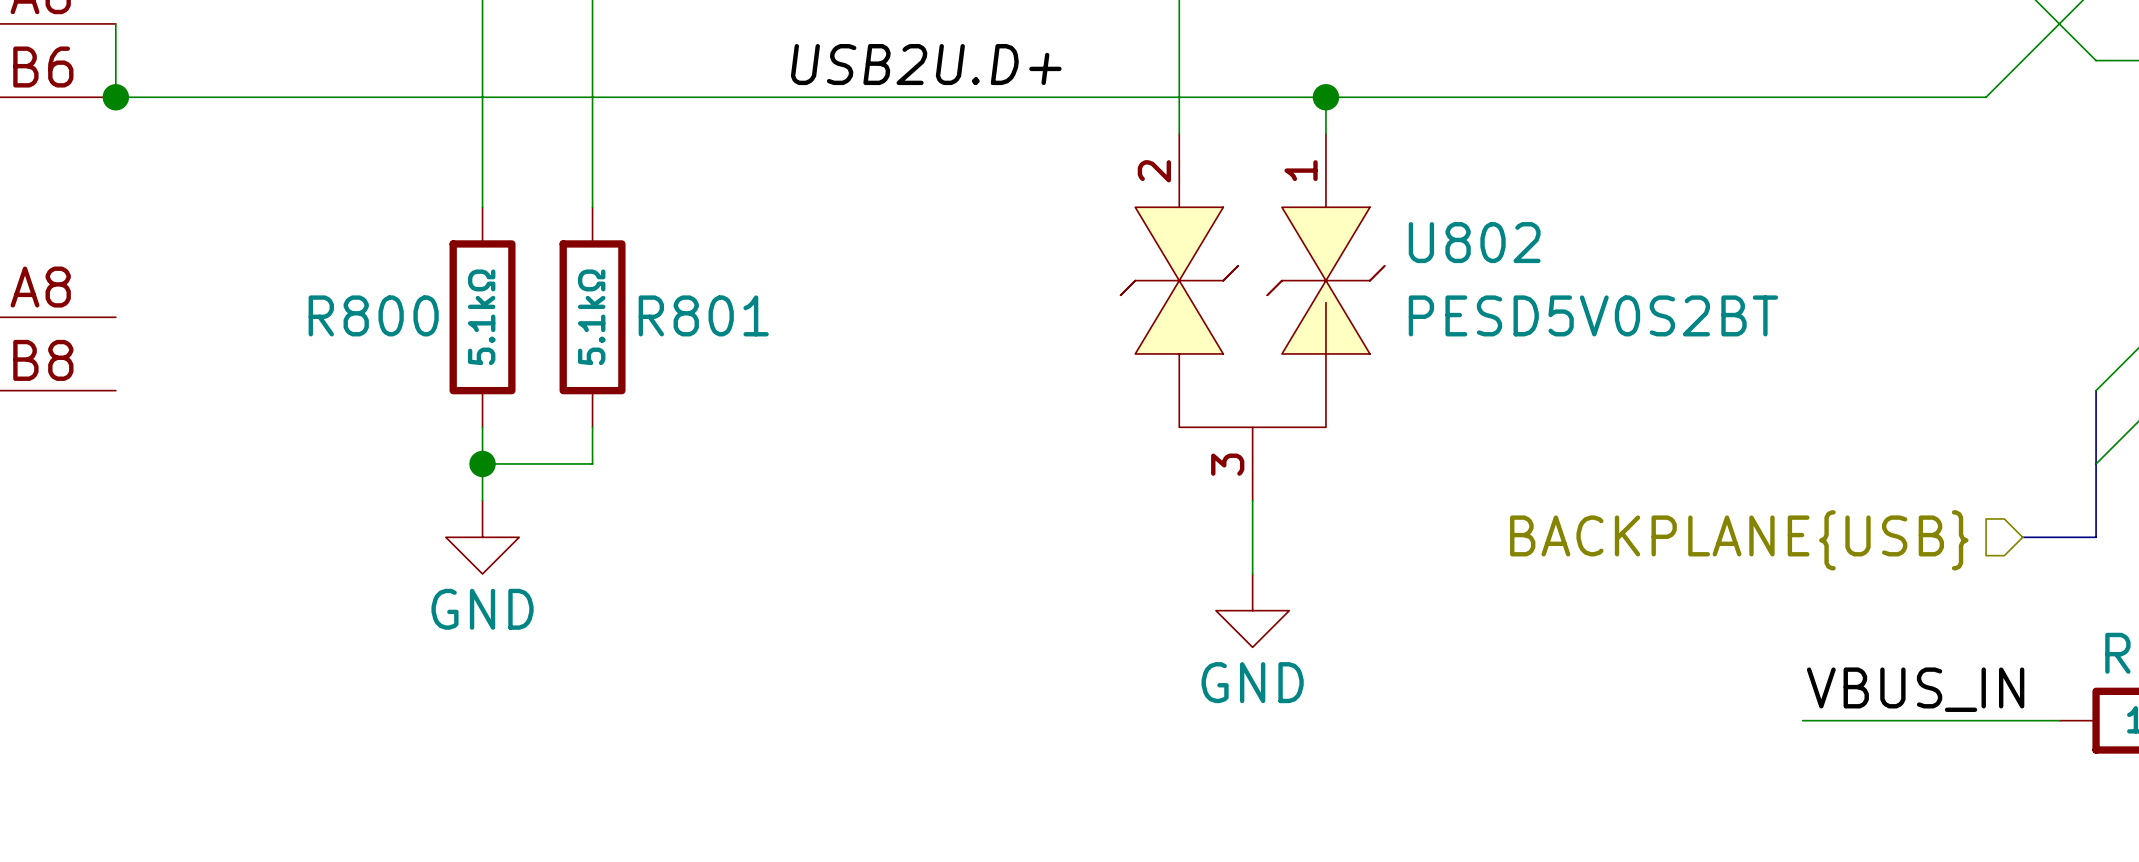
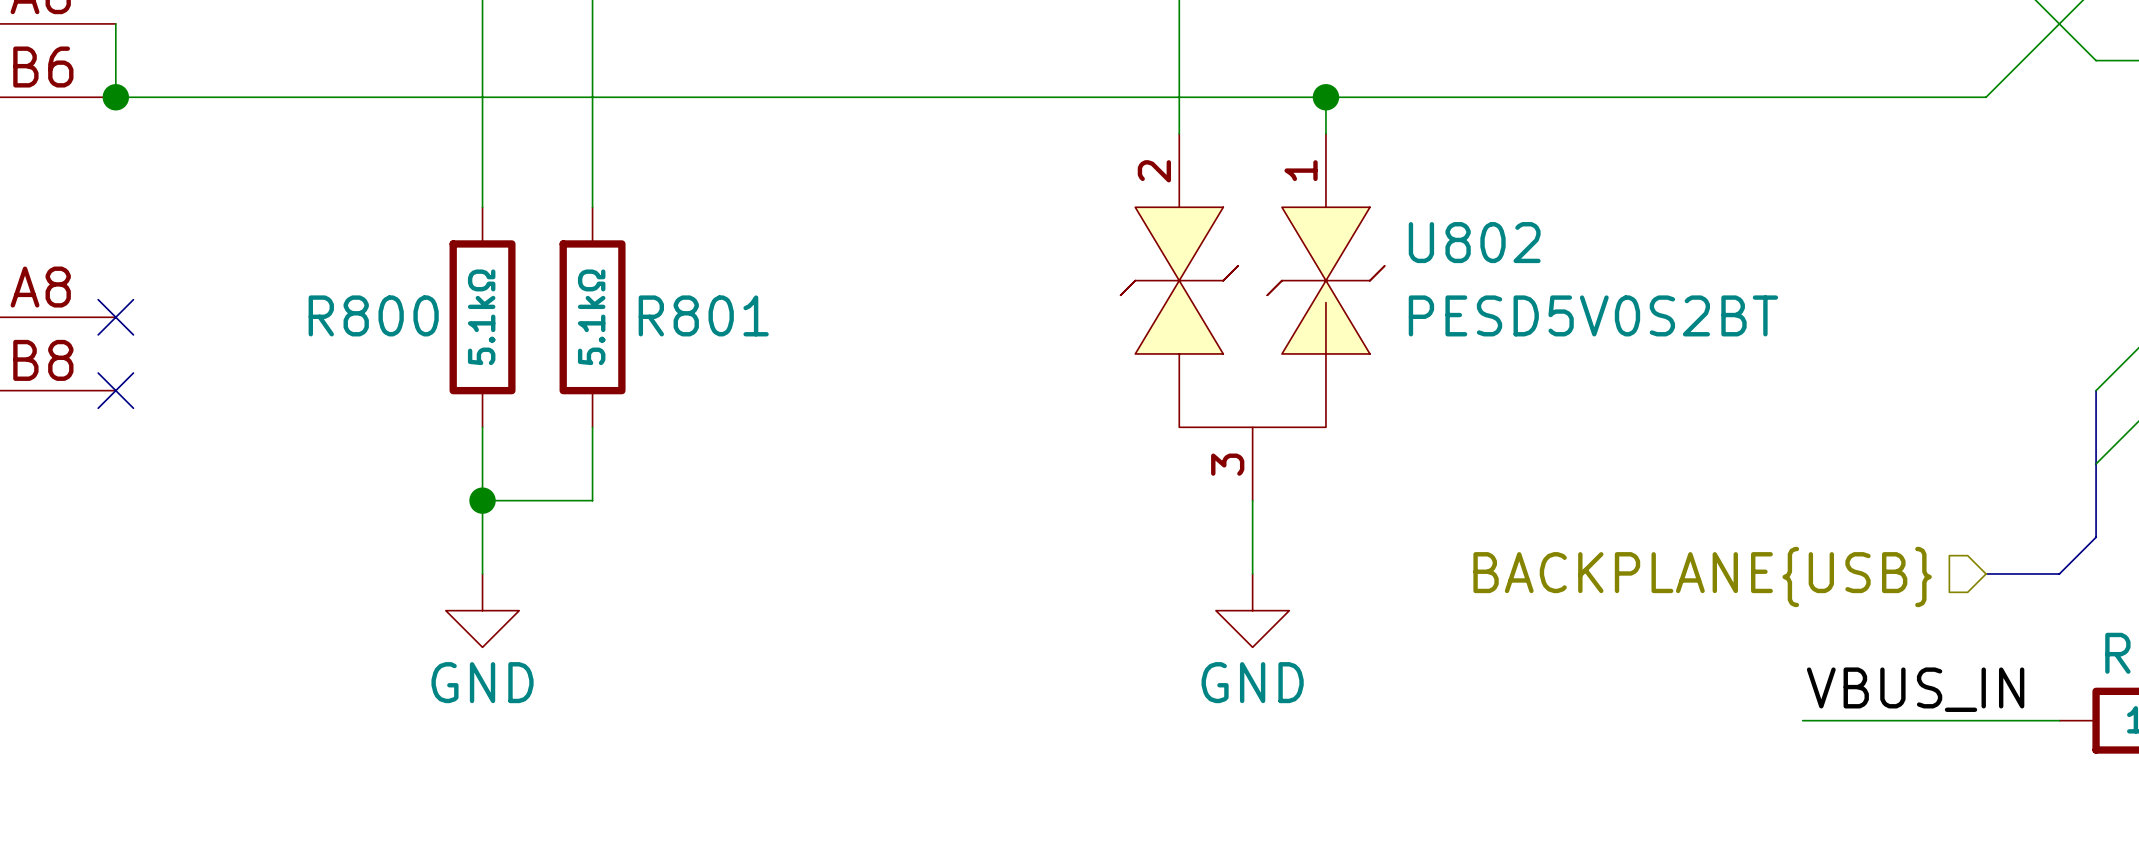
label: USB2U.D+ (926, 64) -> none
no-connect mark: none -> (115, 317)
no-connect mark: none -> (115, 390)
wire: (482, 463) (592, 463) -> (482, 573) (482, 500) (592, 500) (592, 463)
junction position: (482, 463) -> (482, 500)
power symbol position: GND (482, 537) -> GND (482, 610)
bus: (2022, 537) (2096, 537) -> (1986, 573) (2059, 573) (2096, 537)
hierarchical label position: BACKPLANE{USB} (1739, 540) -> BACKPLANE{USB} (1702, 576)

